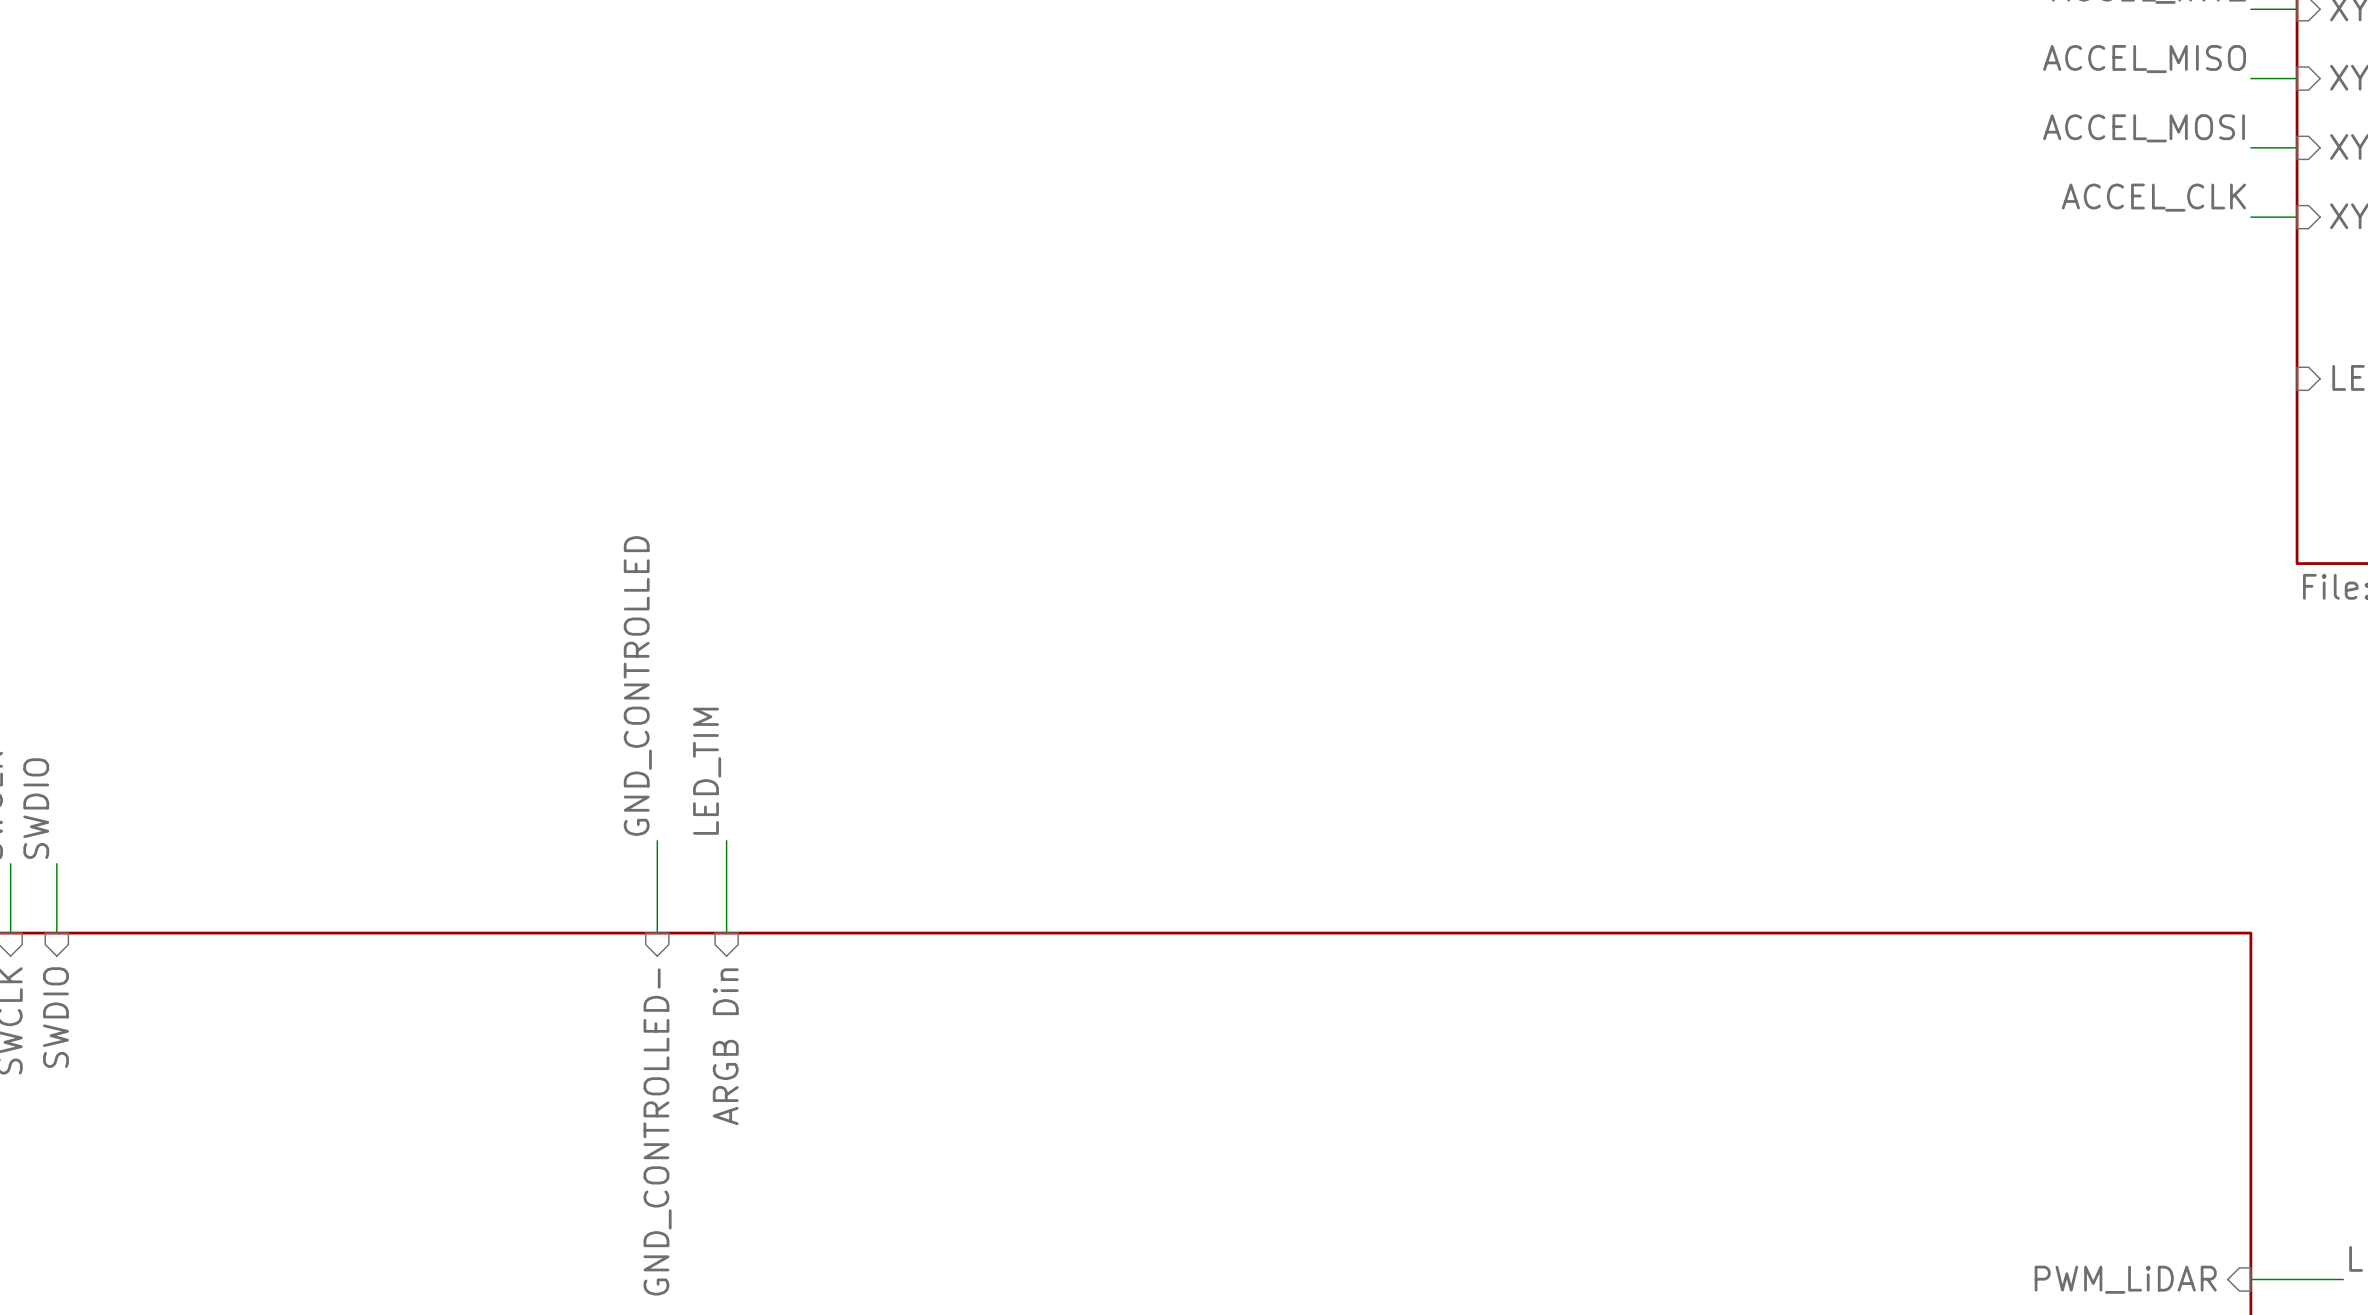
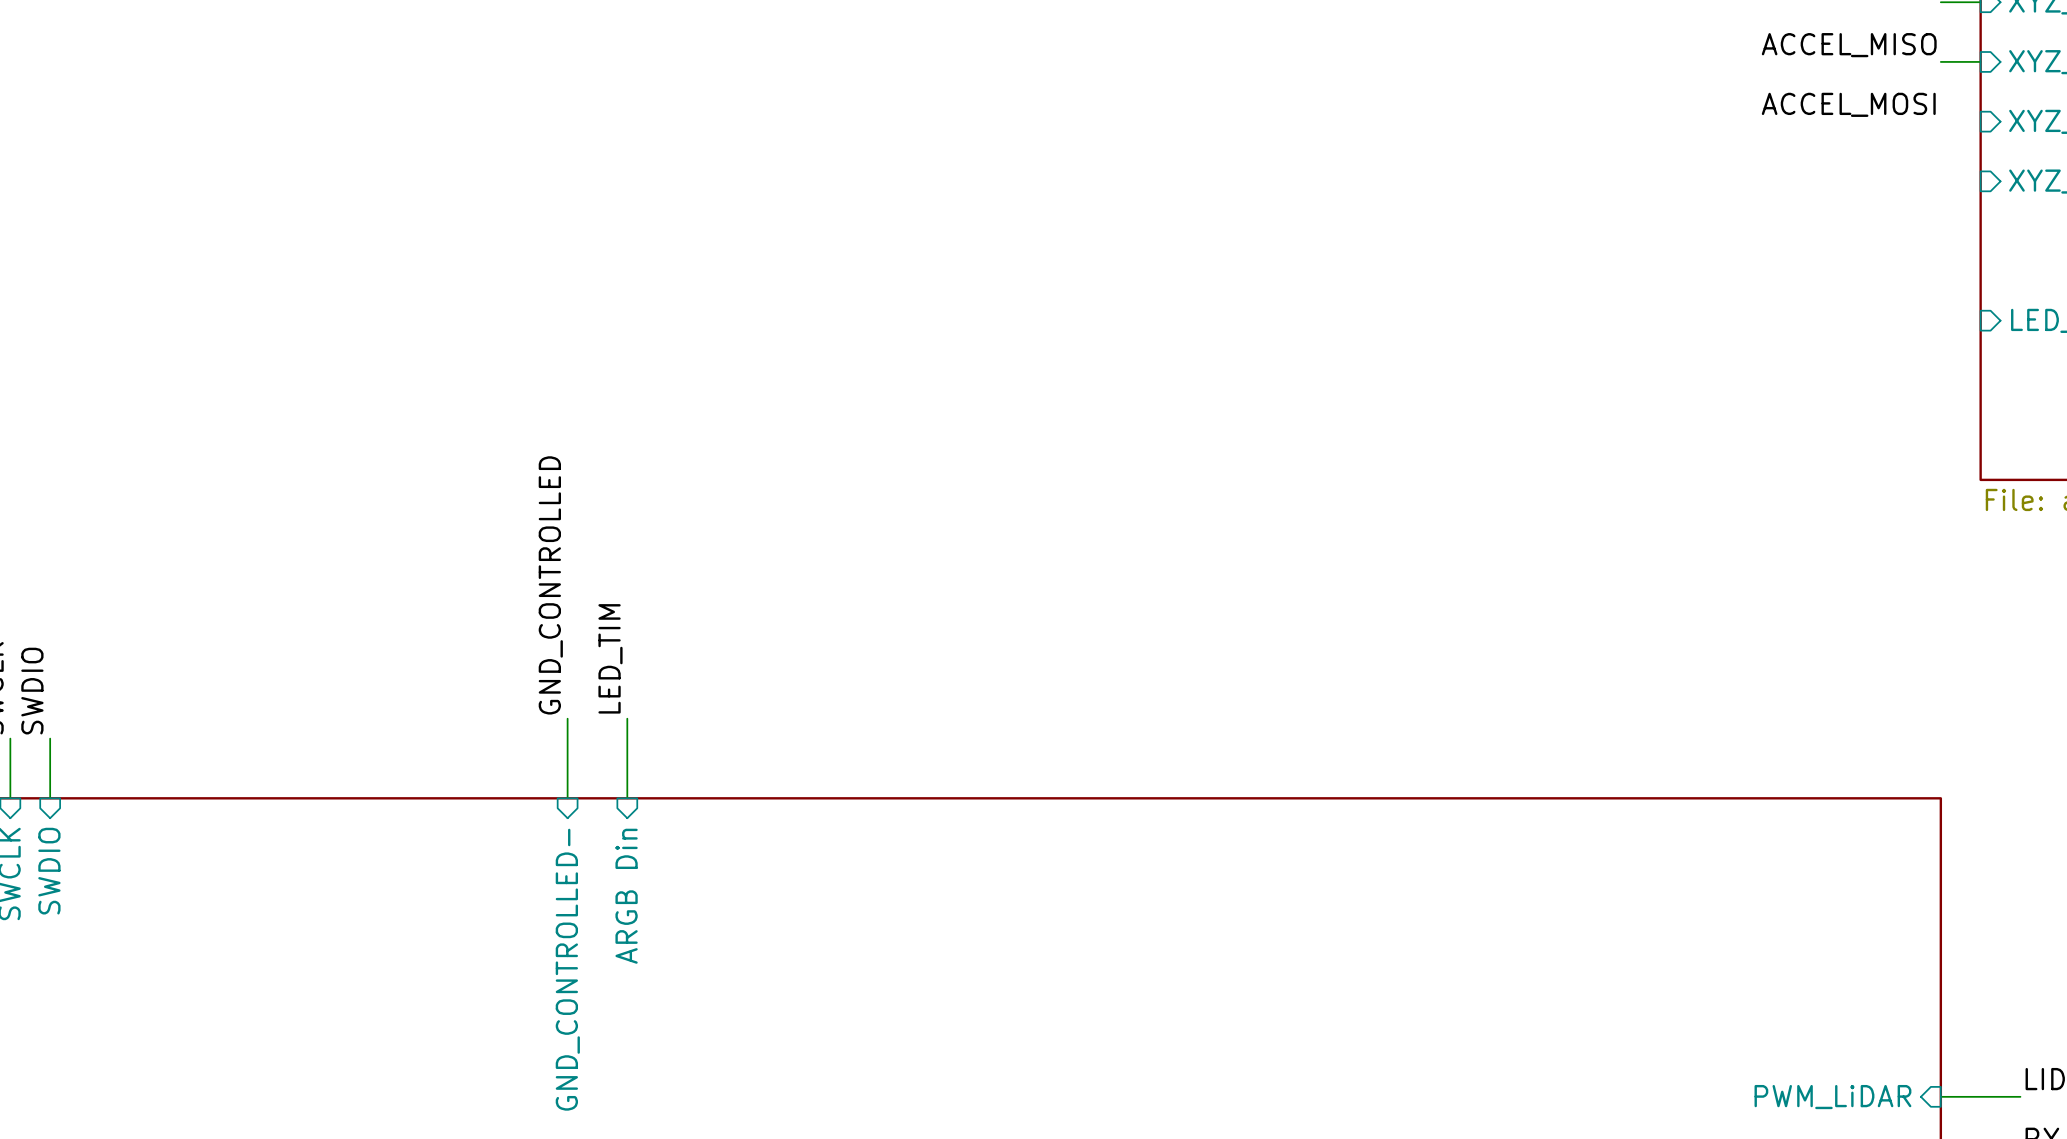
wire: (2250, 147) (2297, 147) -> none
label: ACCEL_CLK (2153, 197) -> none
wire: (2250, 217) (2297, 217) -> none

